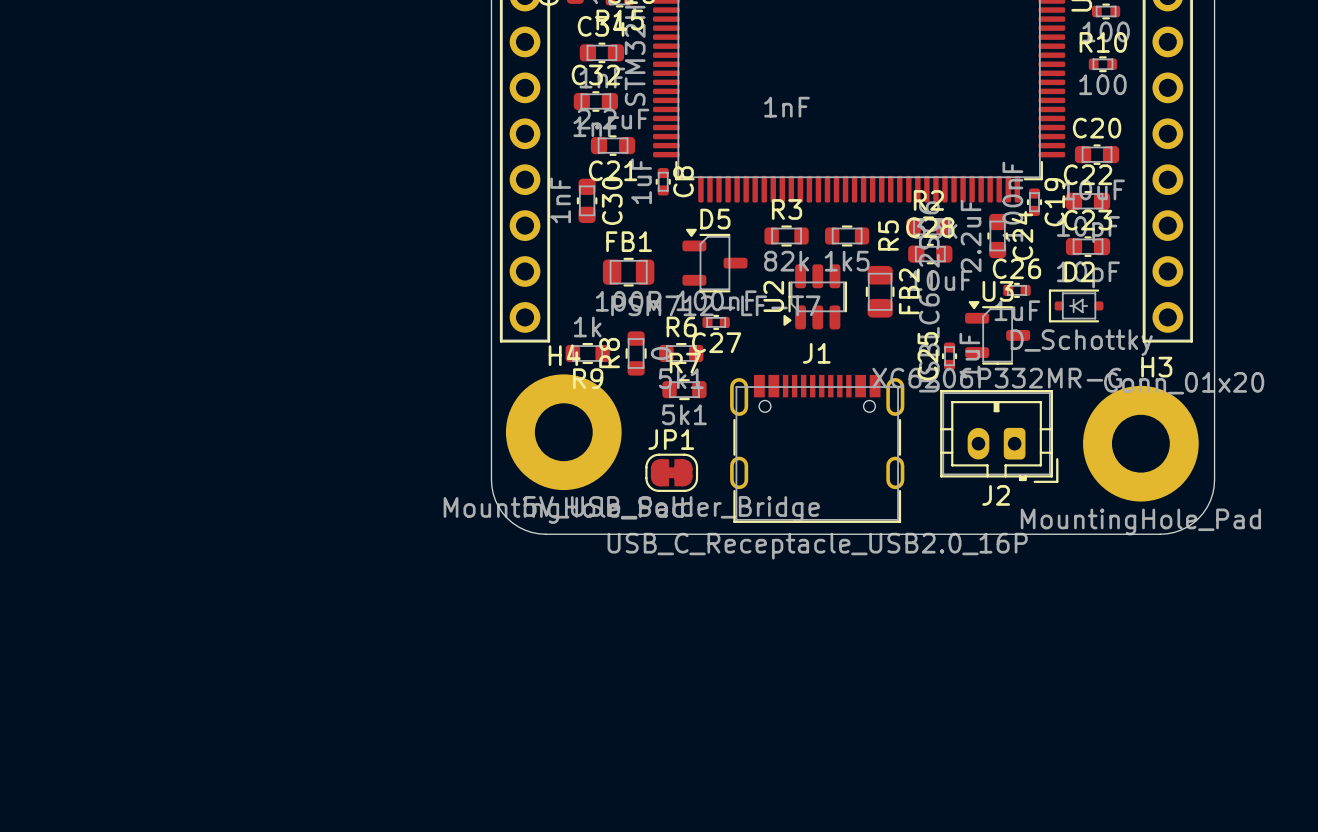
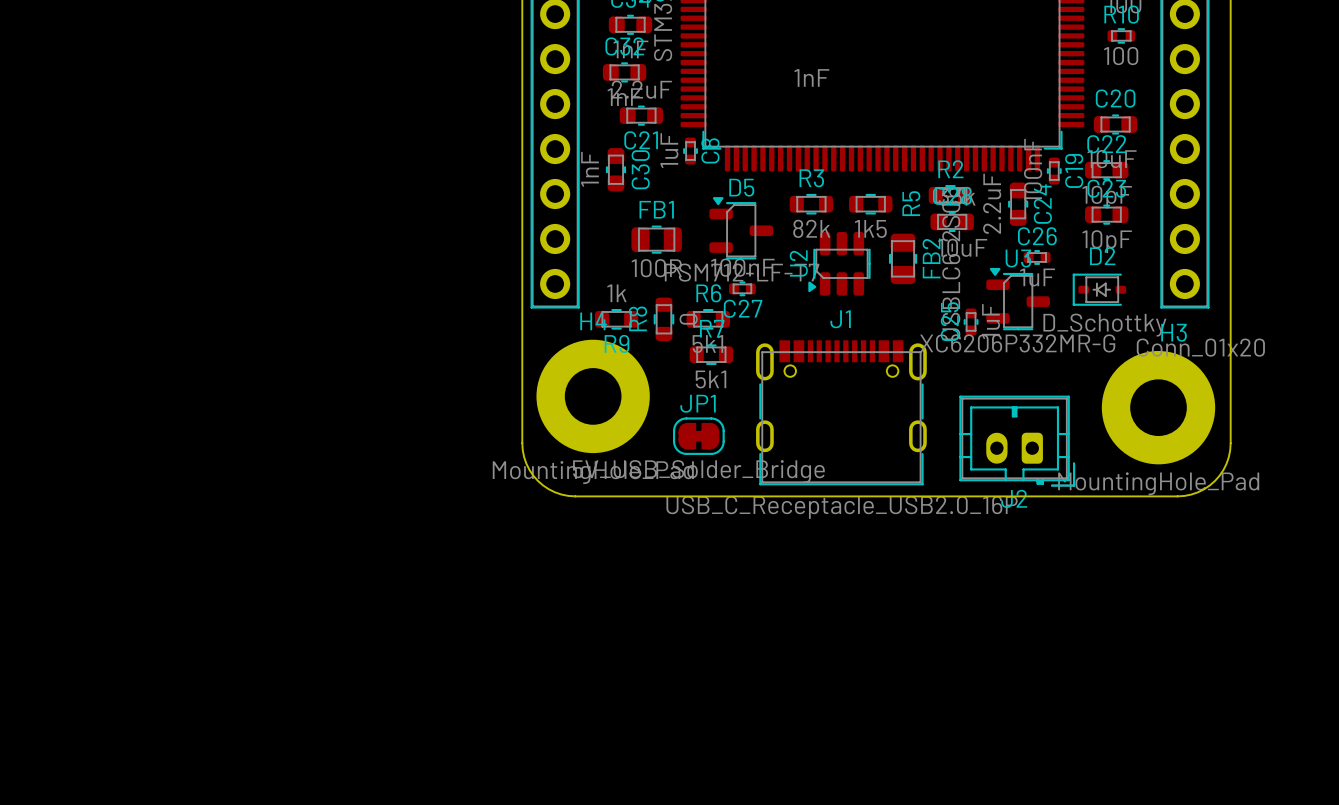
D2 footprint: [1048, 289, 1104, 323] -> [1072, 273, 1127, 306]
J2 position: (999, 436) -> (1017, 441)

